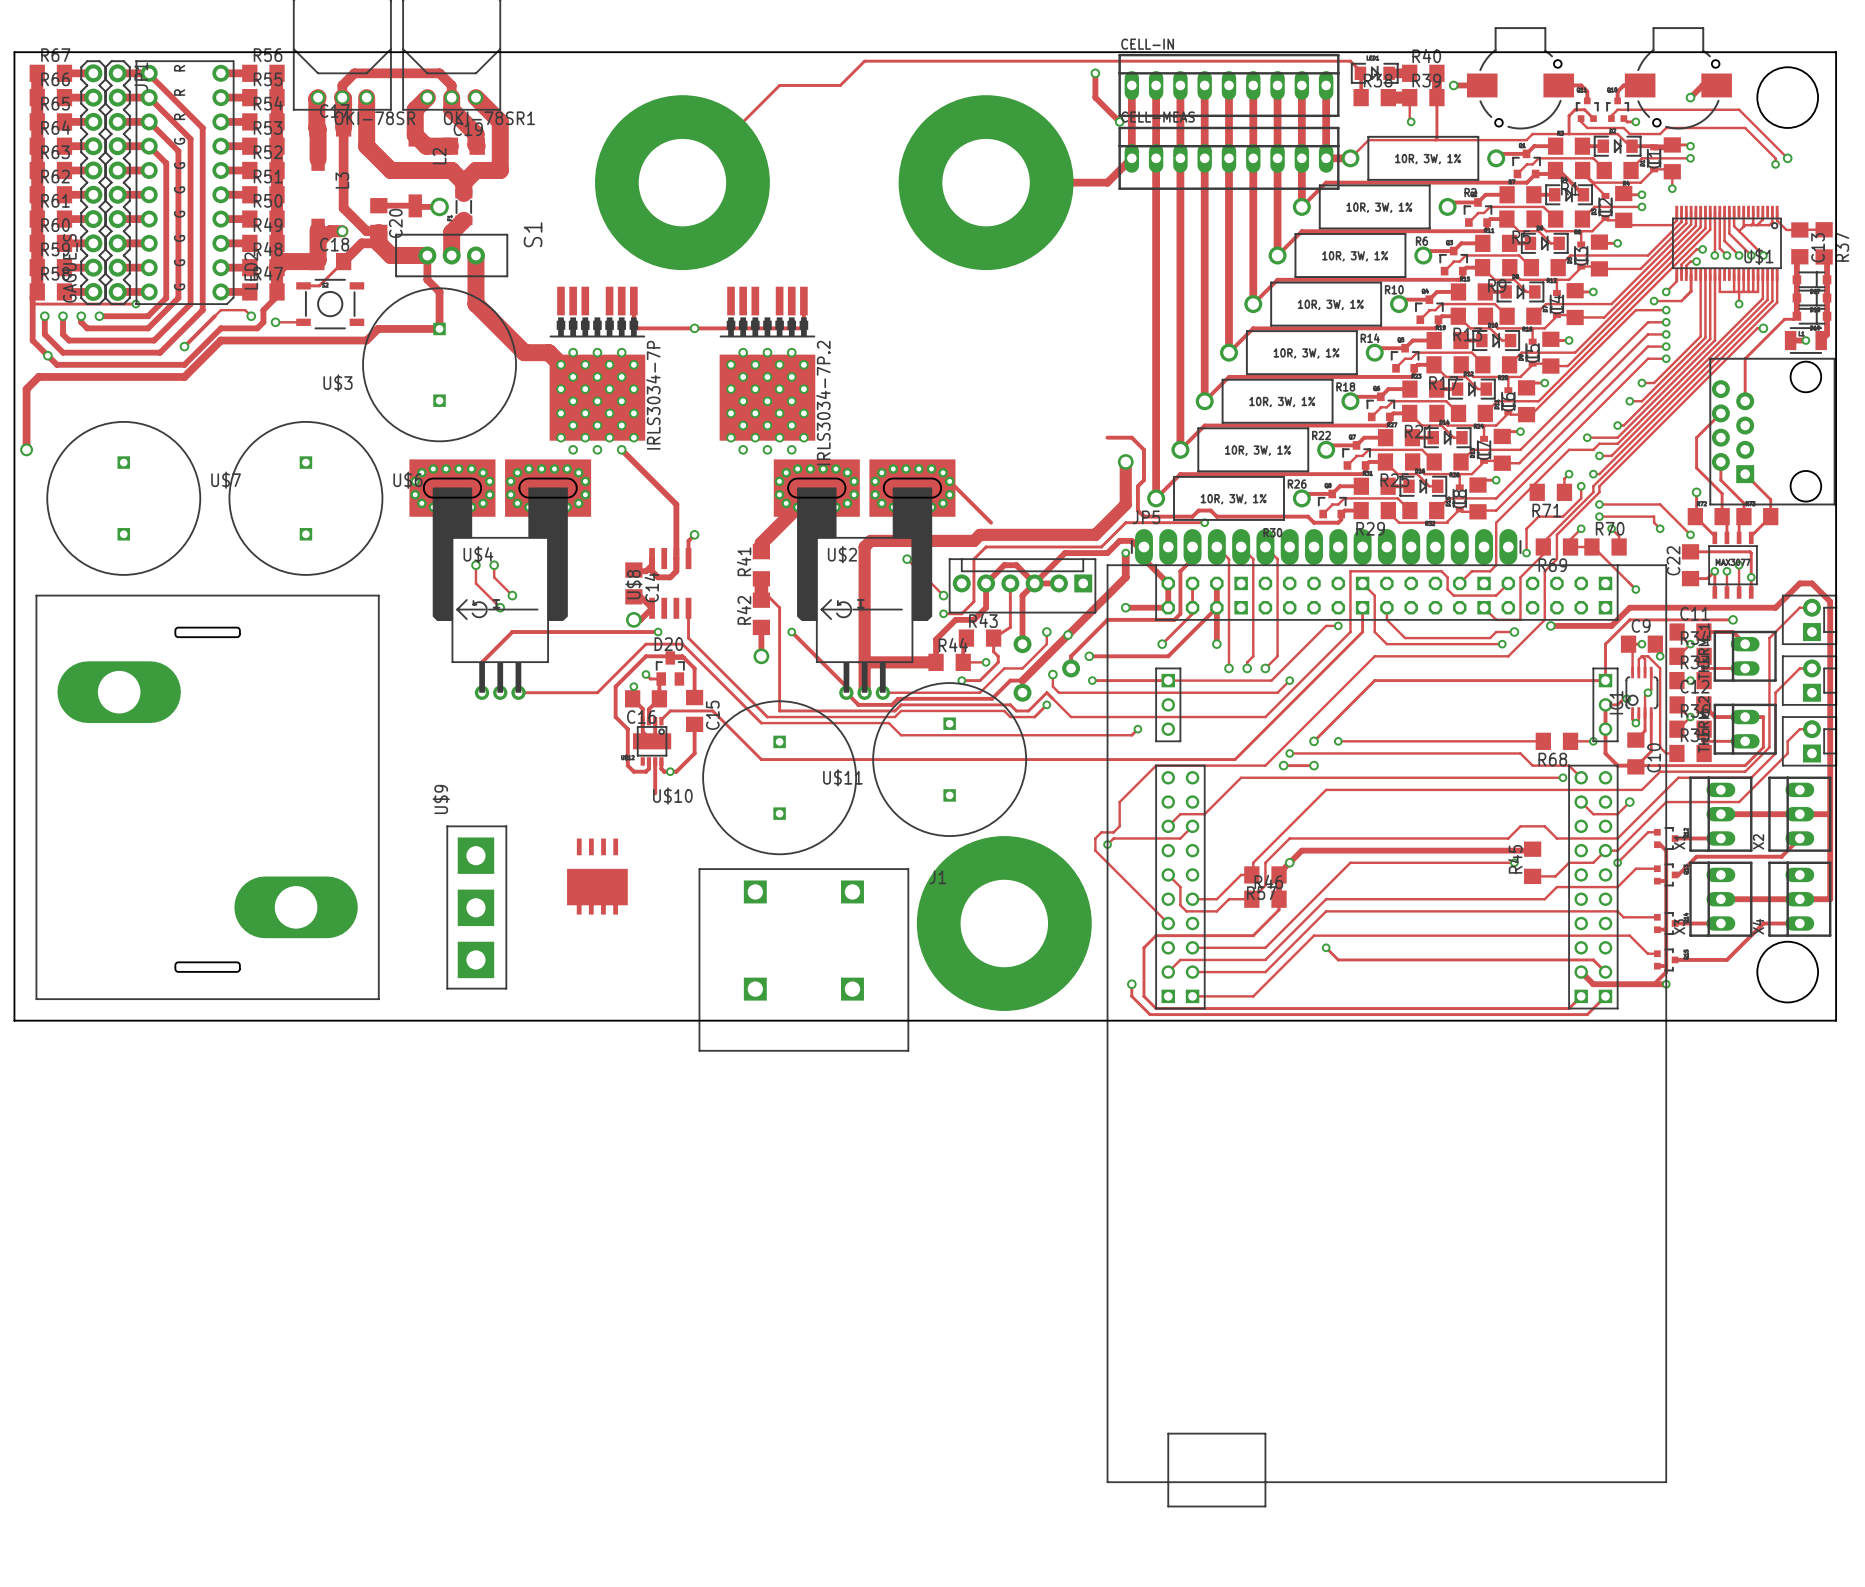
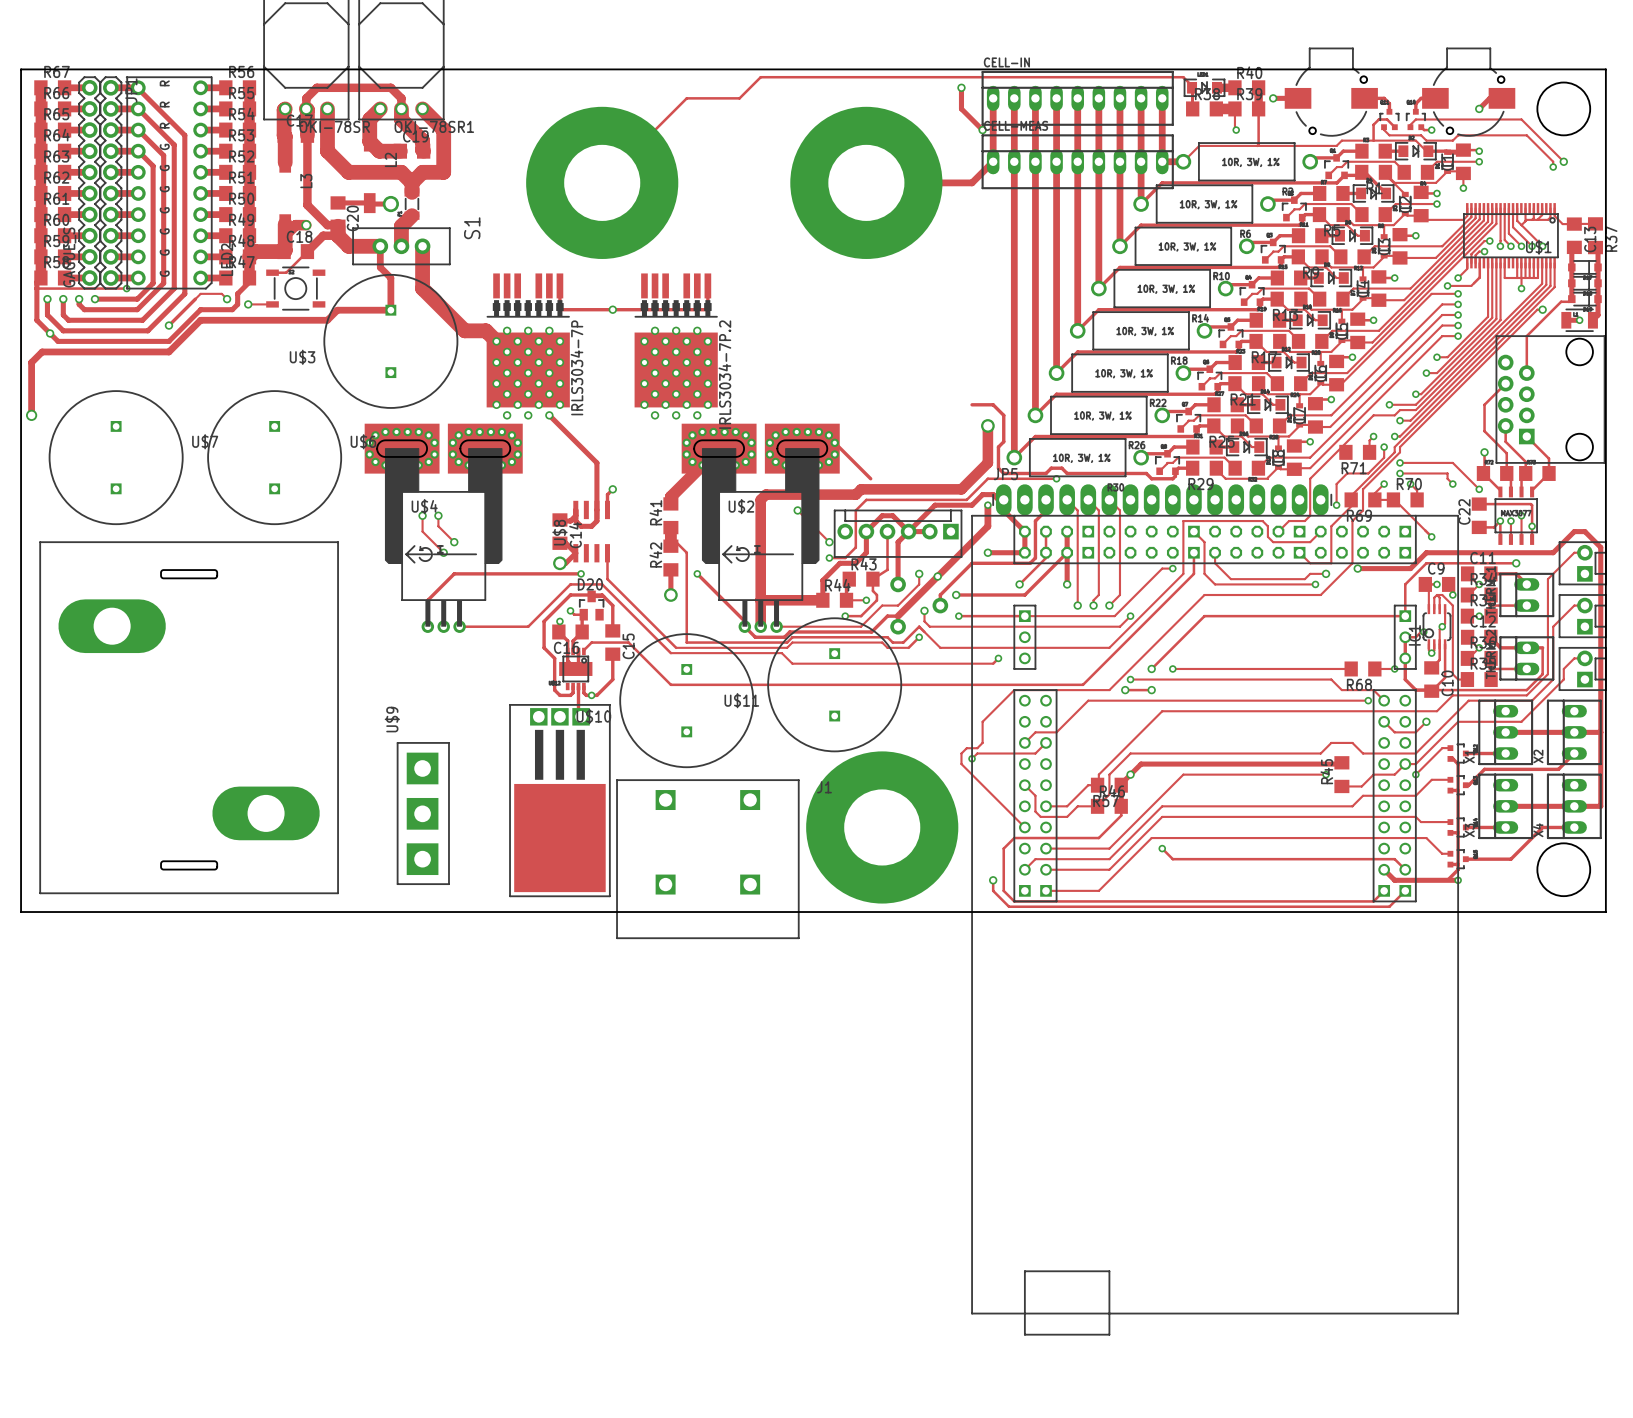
part: (597, 876) -> none
part: none -> (559, 800)

